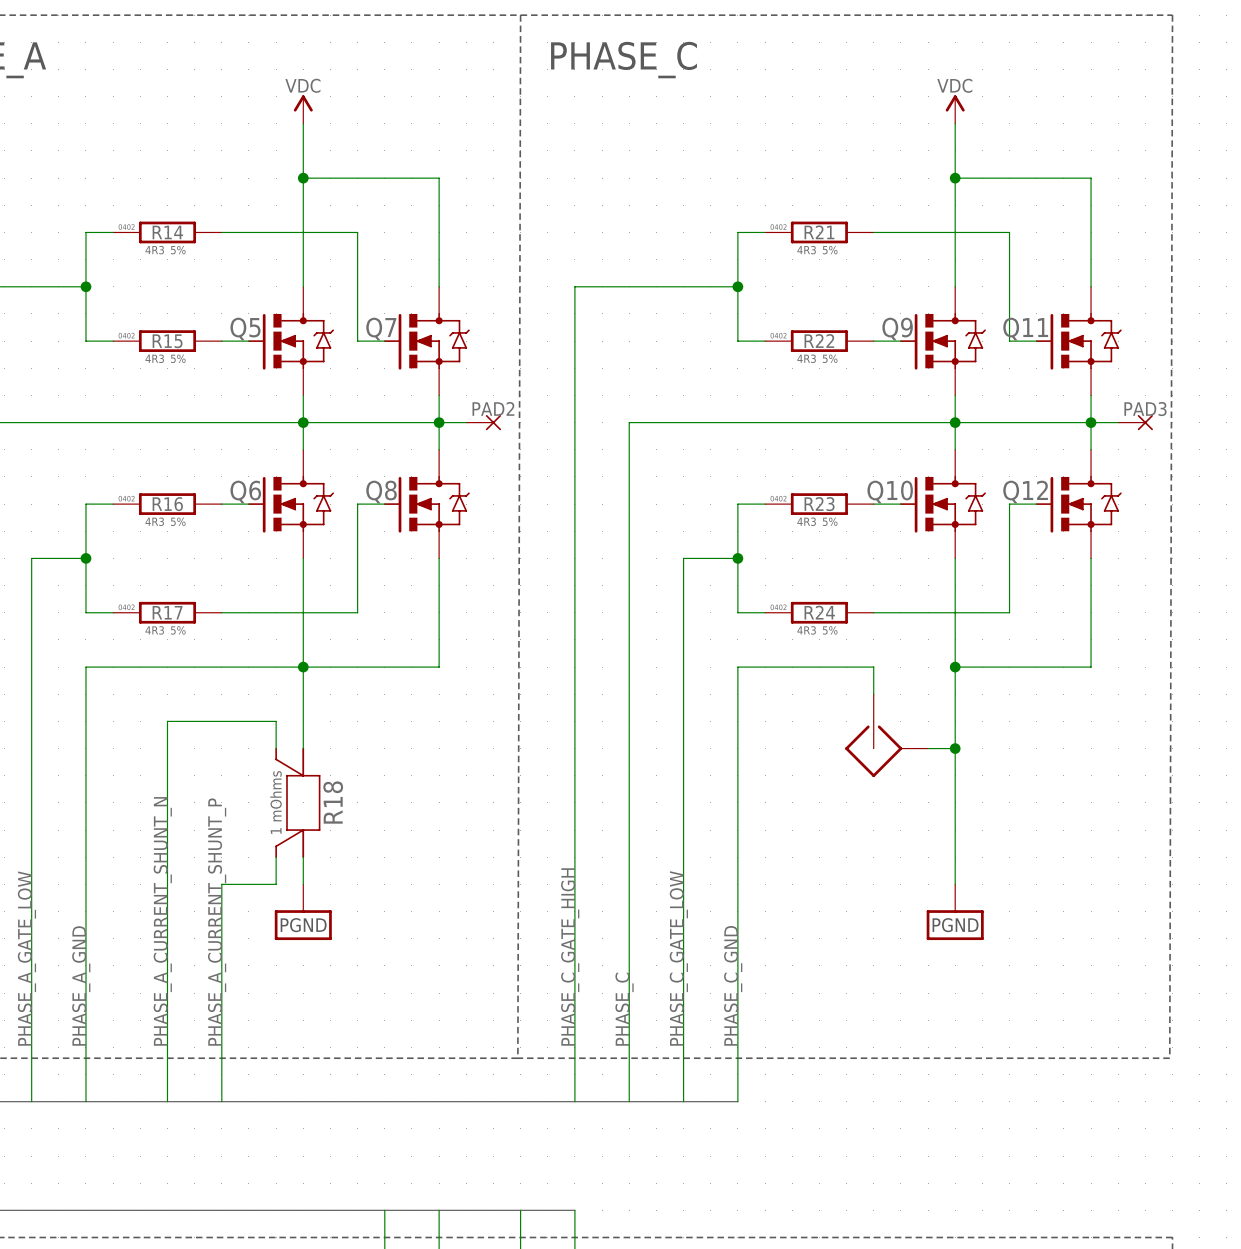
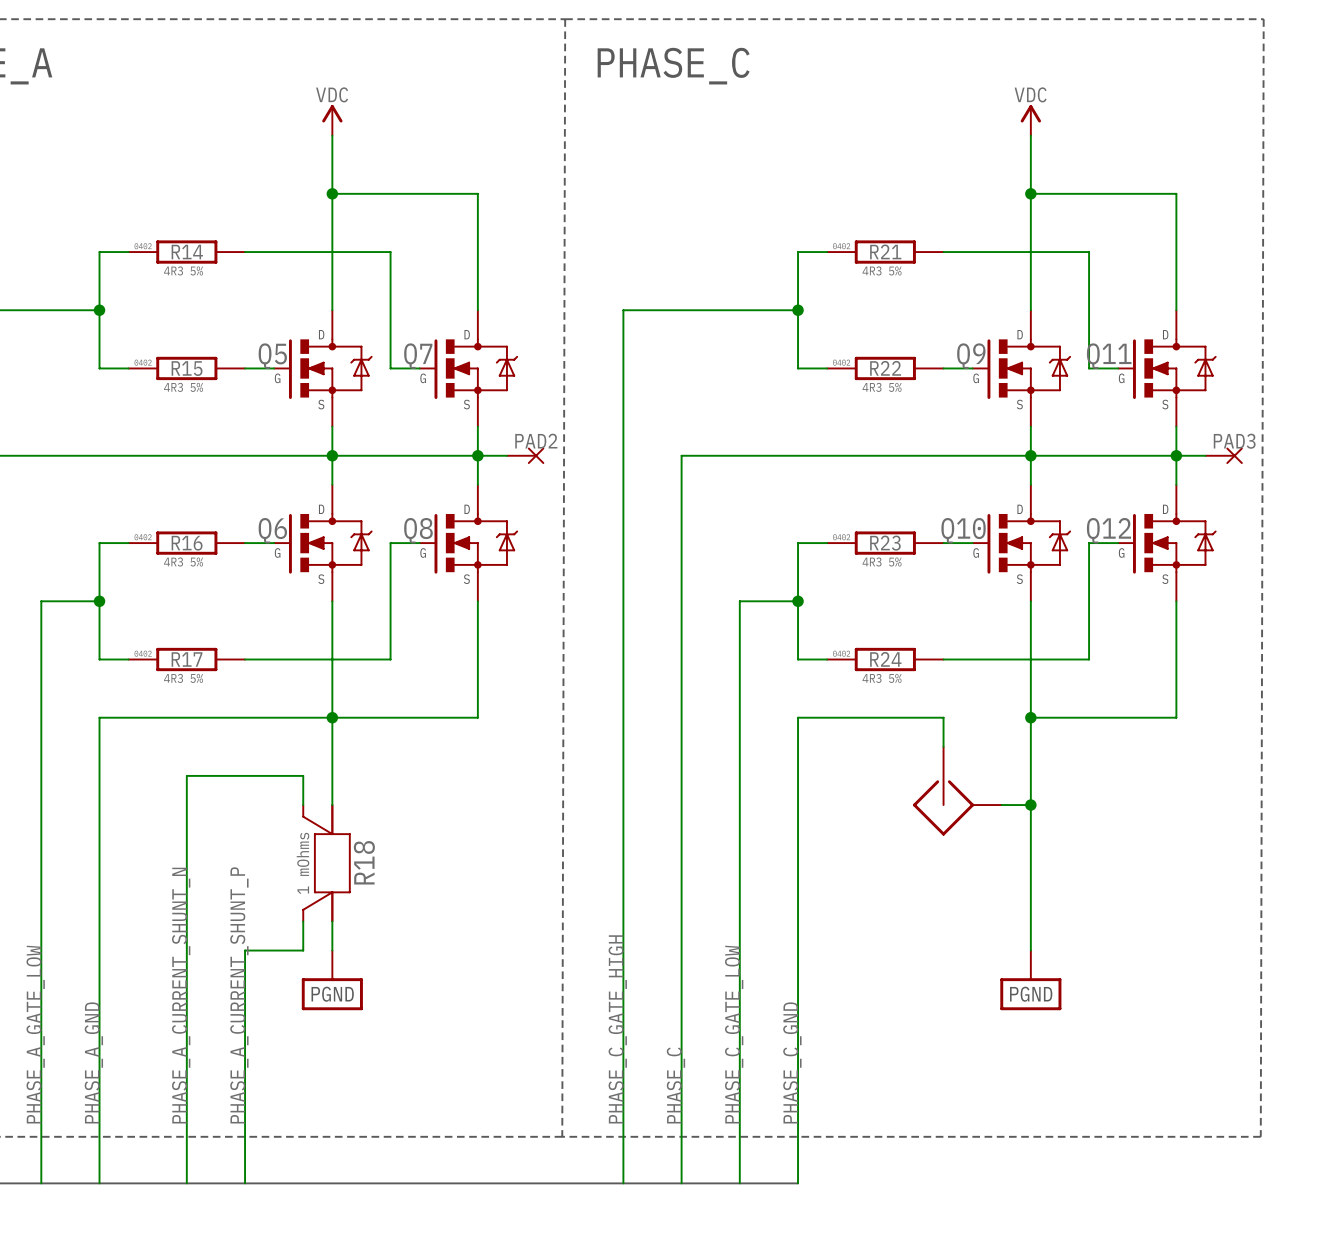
Q5 symbol: [248, 286, 334, 396] -> [273, 310, 373, 427]
Q7 symbol: [383, 286, 470, 396] -> [418, 310, 519, 427]
Q9 symbol: [900, 286, 986, 396] -> [971, 310, 1072, 427]
Q11 symbol: [1035, 286, 1122, 396] -> [1117, 310, 1217, 427]
Q6 symbol: [248, 449, 334, 559] -> [273, 484, 373, 602]
Q8 symbol: [383, 449, 470, 559] -> [418, 484, 519, 602]
Q10 symbol: [900, 449, 986, 559] -> [971, 484, 1072, 602]
Q12 symbol: [1035, 449, 1122, 559] -> [1117, 484, 1217, 602]

